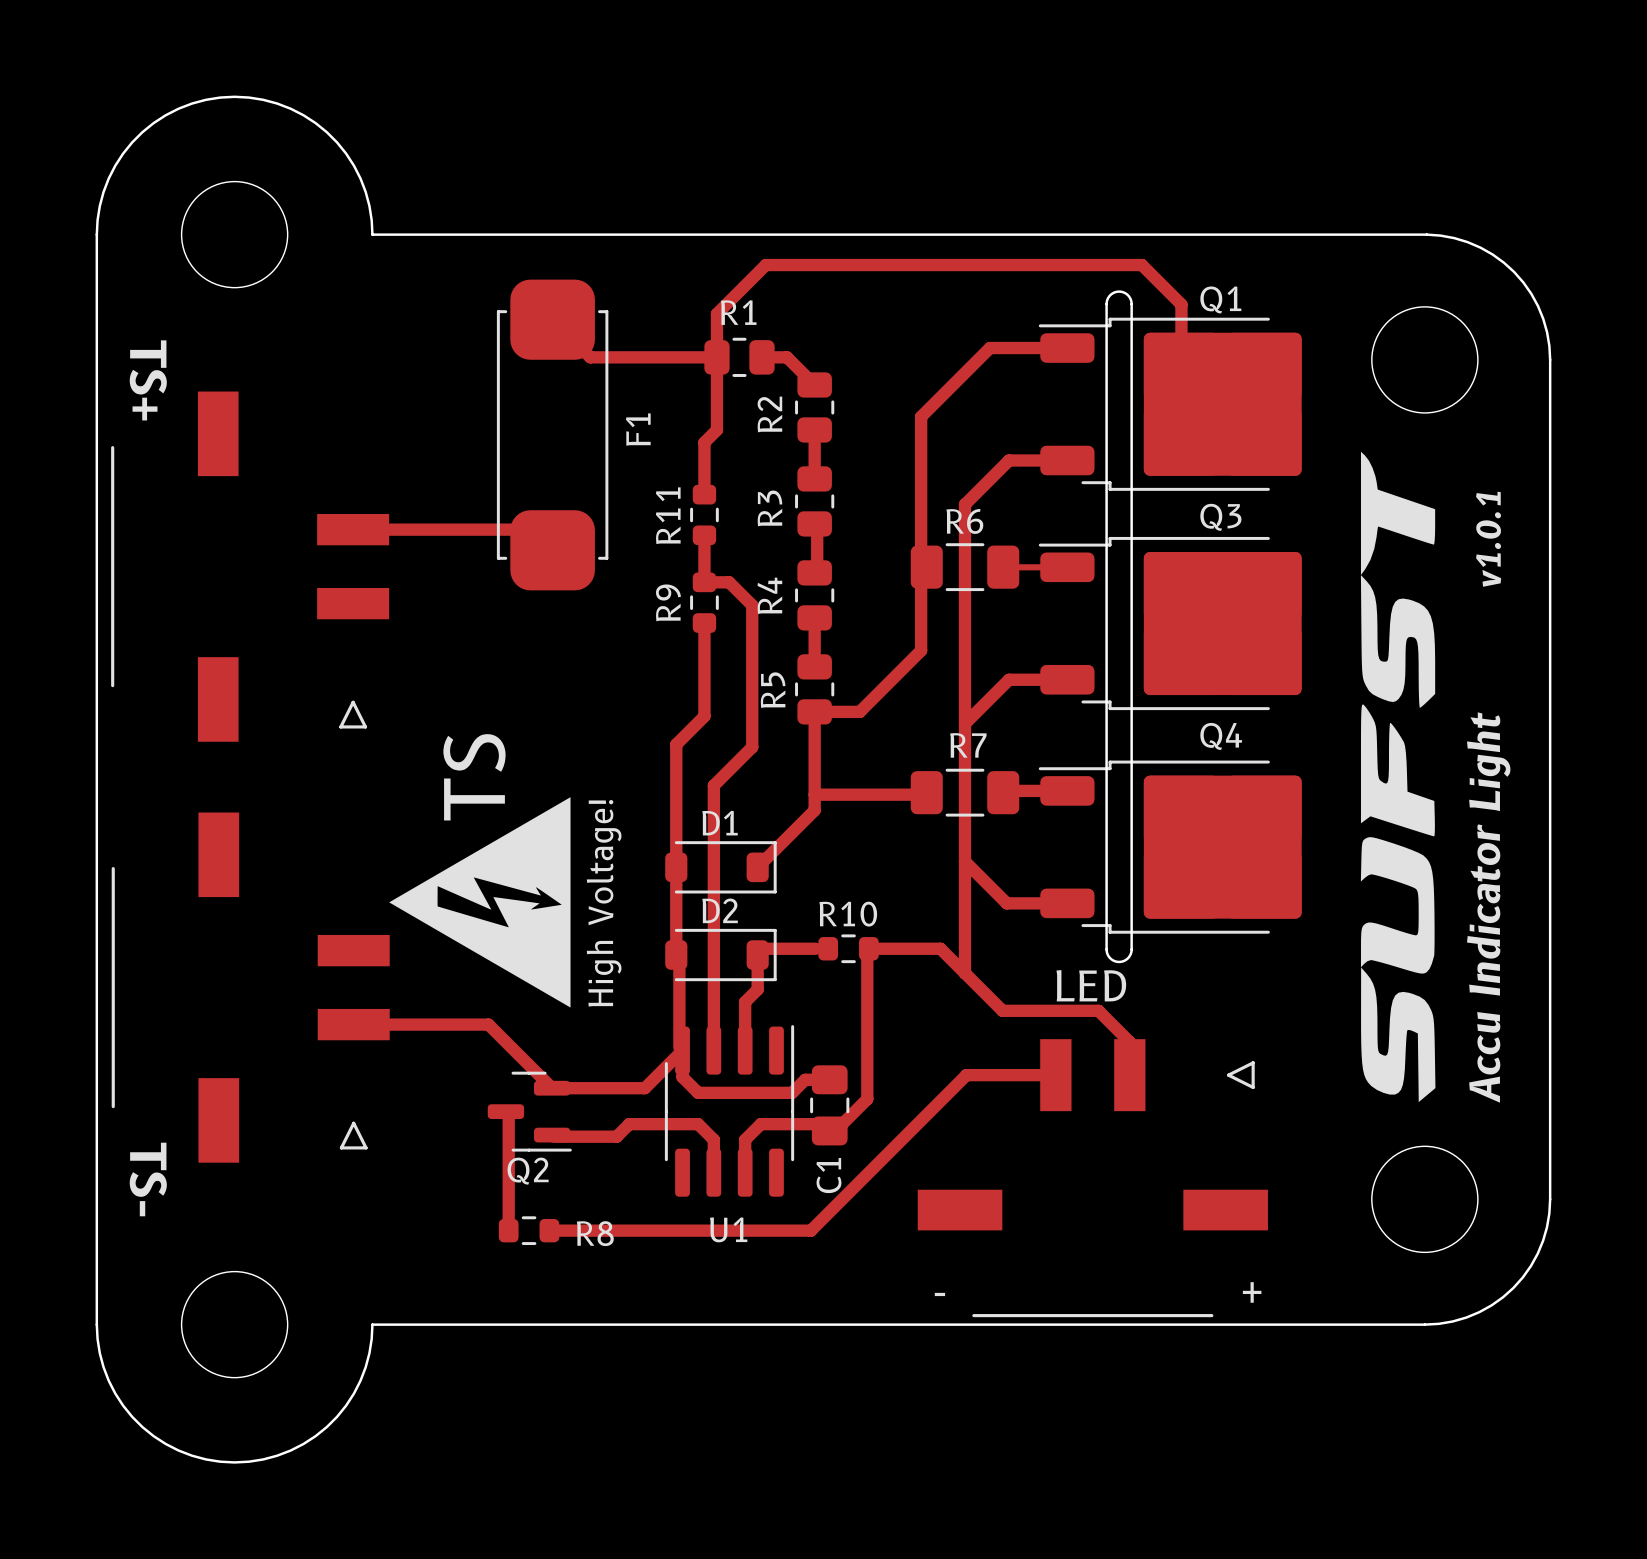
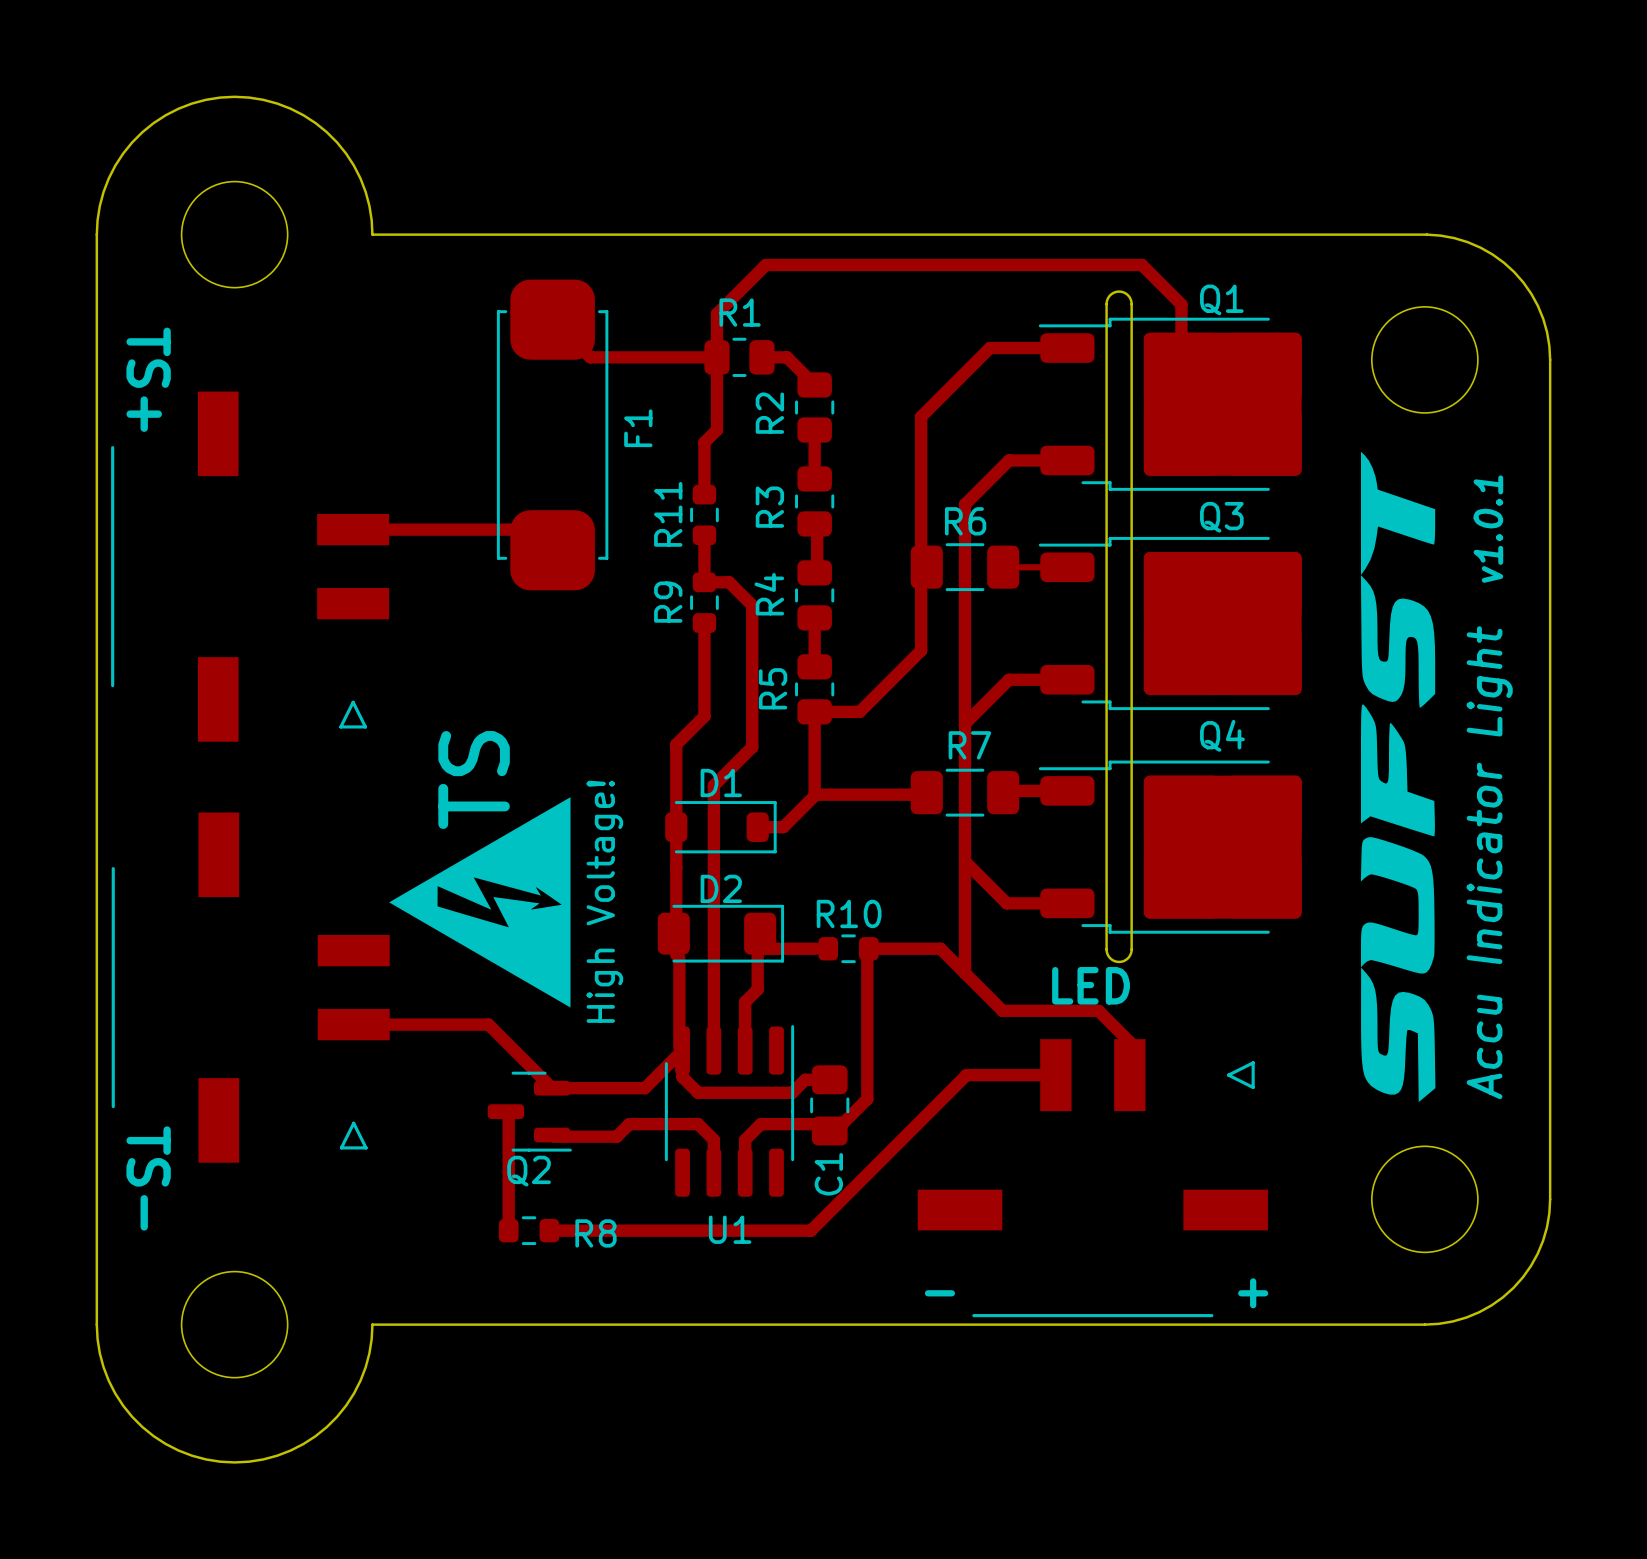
top track: (814, 795) (814, 810) (757, 867) -> (814, 795) (783, 827) (757, 827)
D1 position: (720, 867) -> (720, 827)
D2 footprint: [665, 928, 777, 982] -> [657, 904, 785, 963]

